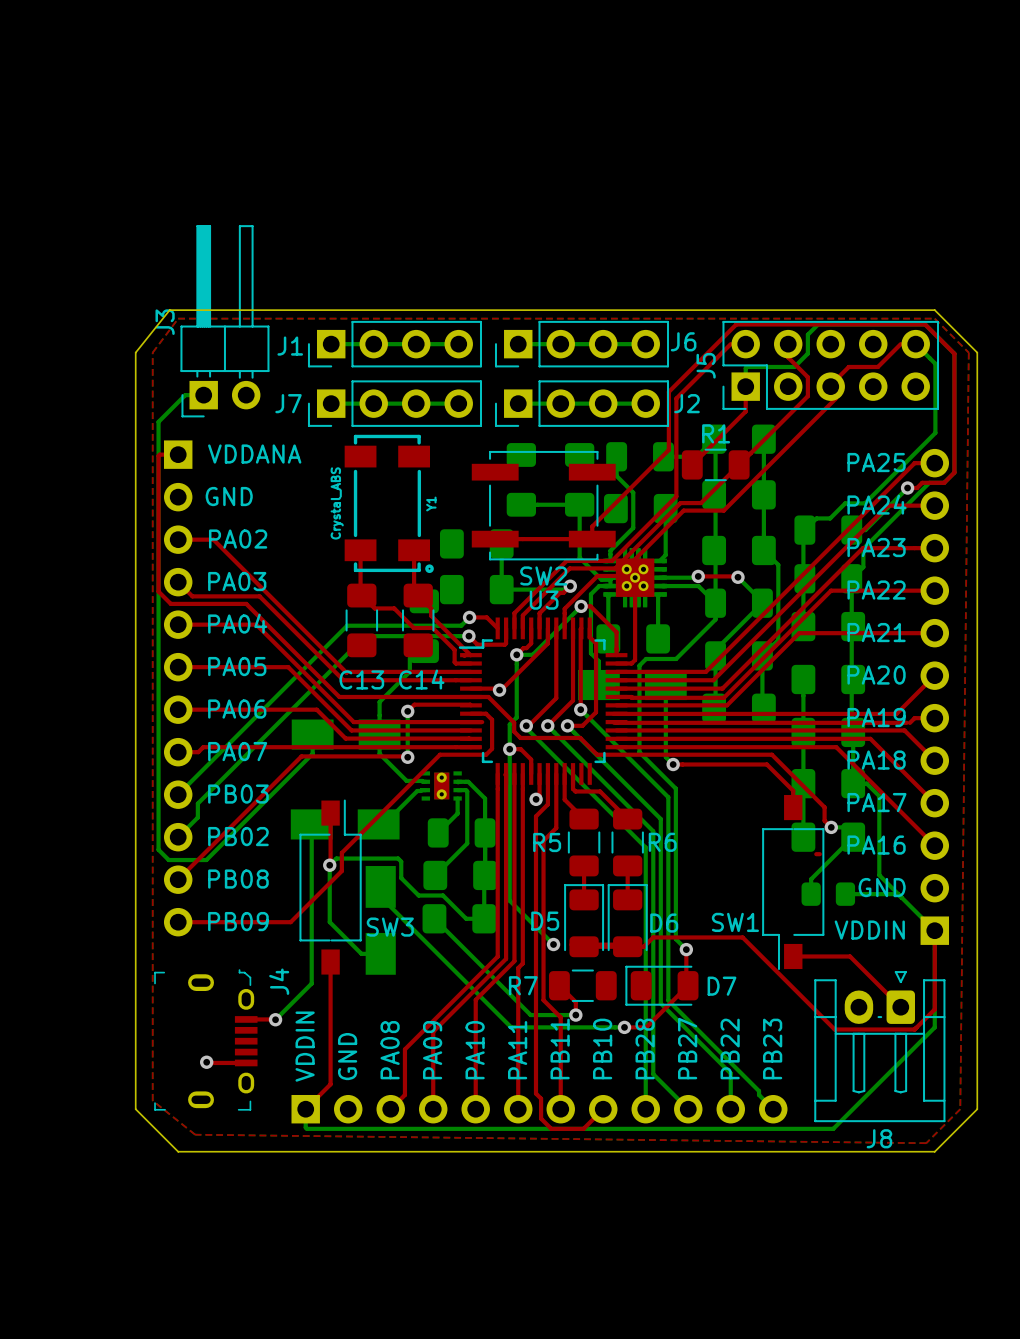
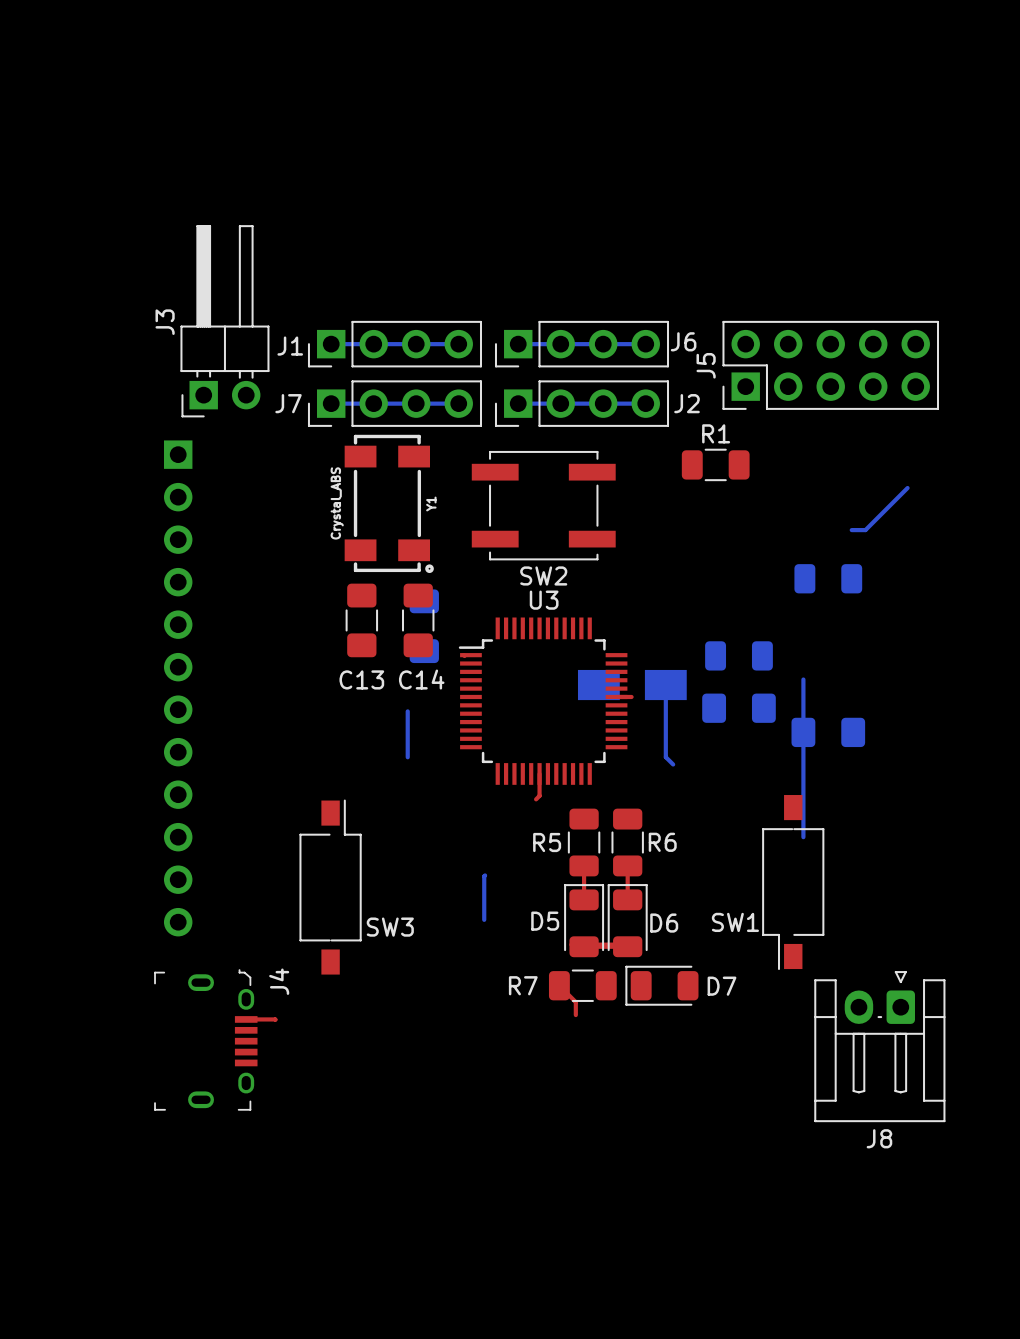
board edge: (169, 310) (135, 352) (135, 1109) (178, 1151) (934, 1151) (977, 1109) (977, 352) (934, 310) (169, 310) -> none
top zone outline: (178, 318) (152, 352) (152, 1100) (195, 1134) (926, 1143) (960, 1109) (968, 352) (934, 318) (178, 318) -> none
top track: (730, 344) (676, 398) (676, 496) (612, 560) (566, 560) (514, 613) (514, 628) -> none
top track: (788, 344) (788, 357) (807, 377) (807, 396) (701, 503) (680, 503) (615, 568) (569, 568) (522, 615) (522, 628) -> none
top track: (900, 344) (877, 366) (848, 366) (835, 380) (835, 398) (723, 510) (683, 510) (618, 575) (597, 575) (564, 608) (564, 628) -> none
bottom track: (915, 344) (935, 363) (935, 432) (864, 503) (845, 503) (830, 518) (816, 518) (803, 531) (803, 626) -> none
bottom track: (745, 386) (746, 366) (794, 366) (807, 353) (807, 334) (818, 324) (925, 324) (954, 353) (954, 472) (944, 482) (929, 482) (863, 548) (863, 567) (851, 578) (853, 783) (866, 783) (879, 796) (879, 875) (934, 930) (934, 1027) (833, 1128) (306, 1128) (305, 1109) -> none
top track: (745, 386) (745, 411) (692, 464) -> none
bottom track: (203, 395) (185, 395) (158, 421) (158, 849) (168, 860) (206, 860) (312, 753) (312, 734) -> none
part: (739, 439) -> none
bottom track: (763, 439) (763, 550) (778, 564) (778, 640) (762, 655) (763, 708) -> none
top track: (178, 454) (158, 455) (158, 591) (170, 603) (246, 603) (339, 696) (488, 696) (514, 722) (514, 731) (520, 737) (580, 737) (597, 754) (771, 754) (824, 807) (824, 820) (831, 827) -> none
text: VDDANA (254, 454) -> none
bottom track: (616, 456) (616, 476) (633, 492) (633, 527) (610, 550) (610, 560) -> none
part: (640, 456) -> none
bottom track: (663, 456) (696, 456) (714, 439) (715, 440) (715, 619) (676, 658) (646, 658) (639, 665) (639, 752) (675, 788) (675, 939) (686, 949) -> none
text: PA25 (876, 462) -> none
top track: (934, 463) (914, 463) (705, 671) (616, 671) -> none
part: (521, 479) -> none
part: (579, 479) -> none
top track: (907, 488) (917, 488) (922, 482) (944, 482) (954, 472) (954, 353) (925, 324) (736, 324) (668, 391) (668, 449) (592, 526) (592, 539) (495, 539) -> none
via: (907, 488) -> none
part: (739, 494) -> none
text: GND (229, 496) -> none
bottom track: (521, 504) (579, 504) (579, 557) (601, 579) (610, 579) -> none
text: PA24 (876, 504) -> none
top track: (934, 505) (888, 505) (713, 680) (616, 680) -> none
part: (640, 508) -> none
bottom track: (665, 508) (665, 555) (659, 560) -> none
part: (828, 530) -> none
top track: (178, 539) (213, 539) (346, 672) (470, 671) -> none
text: PA02 (238, 539) -> none
part: (476, 543) -> none
bottom track: (501, 543) (501, 589) (566, 589) (570, 586) -> none
text: PA23 (876, 547) -> none
top track: (934, 548) (862, 548) (722, 688) (617, 689) -> none
top track: (360, 550) (360, 594) (374, 608) (394, 608) (413, 627) (432, 627) (454, 649) (455, 663) (470, 663) -> none
top track: (414, 550) (414, 591) (431, 608) (431, 615) (470, 655) -> none
part: (739, 550) -> none
bottom track: (698, 576) (659, 577) -> none
top track: (698, 576) (737, 577) -> none
via: (698, 576) -> none
bottom track: (610, 577) (610, 586) (599, 586) (590, 594) (590, 653) (598, 661) (598, 685) -> none
top track: (635, 577) (635, 660) (631, 663) (616, 663) -> none
part: (635, 577) -> none
bottom track: (737, 577) (762, 603) (715, 650) (714, 708) -> none
via: (737, 577) -> none
text: PA03 (237, 581) -> none
top track: (178, 582) (192, 596) (259, 596) (343, 680) (470, 680) -> none
top track: (570, 586) (563, 592) (559, 592) (539, 613) (539, 628) -> none
via: (570, 586) -> none
bottom track: (659, 586) (698, 586) (715, 603) -> none
part: (476, 589) -> none
text: PA22 (876, 590) -> none
top track: (934, 590) (831, 590) (723, 697) (631, 697) -> none
bottom track: (610, 594) (608, 596) (608, 638) -> none
bottom track: (659, 594) (658, 596) (658, 638) -> none
part: (739, 603) -> none
bottom track: (581, 606) (532, 654) (516, 654) (516, 717) (509, 724) (509, 900) (553, 944) -> none
top track: (581, 606) (590, 606) (616, 632) (616, 655) -> none
via: (581, 606) -> none
bottom track: (469, 617) (461, 625) (347, 625) (178, 794) -> none
top track: (469, 617) (486, 617) (497, 628) -> none
via: (469, 617) -> none
text: PA04 (237, 623) -> none
top track: (178, 624) (256, 624) (353, 722) (482, 722) -> none
part: (828, 626) -> none
top track: (506, 628) (504, 644) (477, 644) (468, 636) -> none
top track: (531, 628) (531, 643) (516, 654) -> none
top track: (547, 628) (547, 643) (501, 690) (470, 688) -> none
top track: (556, 628) (556, 698) (526, 728) -> none
top track: (573, 628) (573, 700) (547, 725) -> none
top track: (581, 628) (580, 709) -> none
top track: (589, 628) (589, 637) (596, 643) (596, 712) (582, 725) (567, 725) -> none
text: PA21 (876, 632) -> none
top track: (934, 633) (799, 633) (727, 705) (616, 705) -> none
bottom track: (468, 636) (365, 636) (197, 803) (197, 817) (178, 837) -> none
via: (468, 636) -> none
part: (633, 638) -> none
via: (516, 654) -> none
bottom track: (409, 658) (409, 671) (379, 702) (379, 753) (406, 780) (425, 781) -> none
text: PA05 (237, 666) -> none
top track: (178, 667) (288, 667) (351, 730) (470, 730) -> none
text: PA20 (876, 675) -> none
top track: (934, 675) (896, 713) (613, 713) -> none
part: (828, 679) -> none
via: (499, 690) -> none
part: (934, 696) -> none
top track: (470, 705) (414, 704) (407, 711) -> none
top track: (178, 709) (316, 709) (345, 738) (470, 738) -> none
text: PA06 (237, 709) -> none
bottom track: (580, 709) (668, 797) (668, 1000) (759, 1091) (759, 1094) (773, 1109) -> none
via: (580, 709) -> none
via: (407, 711) -> none
top track: (470, 713) (486, 713) (492, 719) (492, 748) (486, 754) (440, 754) (341, 852) (341, 871) (290, 922) (178, 922) -> none
text: PA19 (876, 717) -> none
top track: (934, 718) (914, 718) (909, 722) -> none
top track: (614, 722) (906, 722) -> none
via: (526, 725) -> none
bottom track: (547, 725) (653, 831) (653, 1074) (688, 1109) -> none
via: (547, 725) -> none
bottom track: (567, 725) (660, 819) (660, 1003) (730, 1073) (730, 1109) -> none
via: (567, 725) -> none
bottom track: (526, 728) (645, 847) (645, 1109) -> none
top track: (616, 730) (904, 730) (934, 760) -> none
part: (346, 734) -> none
top track: (616, 738) (870, 738) (934, 803) -> none
top track: (479, 747) (203, 747) (198, 752) (178, 752) -> none
top track: (616, 747) (836, 747) (934, 845) -> none
top track: (509, 749) (520, 749) (531, 759) (531, 773) -> none
via: (509, 749) -> none
text: PA07 (237, 751) -> none
top track: (408, 756) (301, 756) (178, 879) -> none
via: (407, 757) -> none
text: PA18 (876, 760) -> none
top track: (673, 764) (766, 764) (793, 790) (793, 807) -> none
via: (673, 764) -> none
top track: (497, 773) (497, 956) (404, 1049) (404, 1094) (390, 1109) -> none
top track: (514, 773) (514, 961) (475, 999) (475, 1109) -> none
top track: (522, 773) (522, 963) (518, 968) (518, 1109) -> none
top track: (547, 773) (547, 804) (535, 816) (535, 1093) (541, 1098) (541, 1118) (551, 1128) (583, 1128) (603, 1109) -> none
top track: (556, 773) (556, 828) (543, 840) (543, 1000) (560, 1017) (560, 1109) -> none
top track: (564, 773) (564, 799) (584, 819) -> none
top track: (573, 773) (573, 789) (575, 791) (600, 791) (627, 819) -> none
top track: (505, 774) (506, 958) (433, 1031) (433, 1109) -> none
bottom track: (458, 782) (468, 781) (485, 798) (485, 877) -> none
part: (828, 783) -> none
part: (441, 785) -> none
bottom track: (425, 790) (417, 790) (383, 824) -> none
bottom track: (457, 790) (467, 791) (467, 843) (435, 875) -> none
text: PB03 (238, 794) -> none
bottom track: (457, 798) (457, 813) (438, 832) -> none
via: (536, 799) -> none
text: PA17 (876, 802) -> none
top track: (330, 813) (329, 865) -> none
bottom track: (311, 824) (311, 983) (275, 1019) -> none
part: (345, 824) -> none
bottom track: (831, 827) (843, 827) (853, 837) (811, 879) (811, 894) -> none
via: (831, 827) -> none
part: (461, 832) -> none
text: PB02 (238, 836) -> none
part: (828, 837) -> none
text: PA16 (876, 845) -> none
top track: (816, 854) (819, 854) -> none
via: (329, 865) -> none
part: (460, 875) -> none
text: PB08 (238, 879) -> none
bottom track: (380, 886) (380, 896) (511, 1027) (624, 1027) -> none
text: GND (882, 887) -> none
part: (828, 894) -> none
bottom track: (845, 894) (898, 894) -> none
bottom track: (434, 918) (530, 1015) (575, 1015) -> none
part: (459, 918) -> none
bottom track: (484, 918) (466, 918) (442, 895) (418, 895) (401, 878) (401, 861) (398, 858) (336, 858) (329, 865) (329, 922) (361, 953) (380, 953) (380, 940) -> none
part: (380, 920) -> none
text: PB09 (238, 921) -> none
text: VDDIN (869, 930) -> none
top track: (934, 930) (934, 1009) (914, 1029) (834, 1029) (742, 937) (653, 937) (644, 946) (627, 946) -> none
via: (553, 944) -> none
top track: (686, 949) (686, 984) (688, 985) (646, 1027) (624, 1027) -> none
via: (686, 949) -> none
top track: (793, 956) (850, 956) (900, 1007) -> none
top track: (330, 962) (330, 1084) (305, 1109) -> none
via: (575, 1015) -> none
via: (275, 1019) -> none
via: (624, 1027) -> none
text: VDDIN (305, 1046) -> none
text: PB11 (560, 1048) -> none
text: PB10 (602, 1048) -> none
text: PB28 (645, 1048) -> none
text: PB27 (687, 1048) -> none
text: PB22 (730, 1048) -> none
text: PB23 (772, 1048) -> none
text: PA08 (390, 1050) -> none
text: PA09 (432, 1050) -> none
text: PA10 (475, 1050) -> none
text: PA11 (517, 1050) -> none
text: GND (347, 1056) -> none
top track: (206, 1062) (246, 1062) -> none
via: (206, 1062) -> none
part: (539, 1109) -> none

